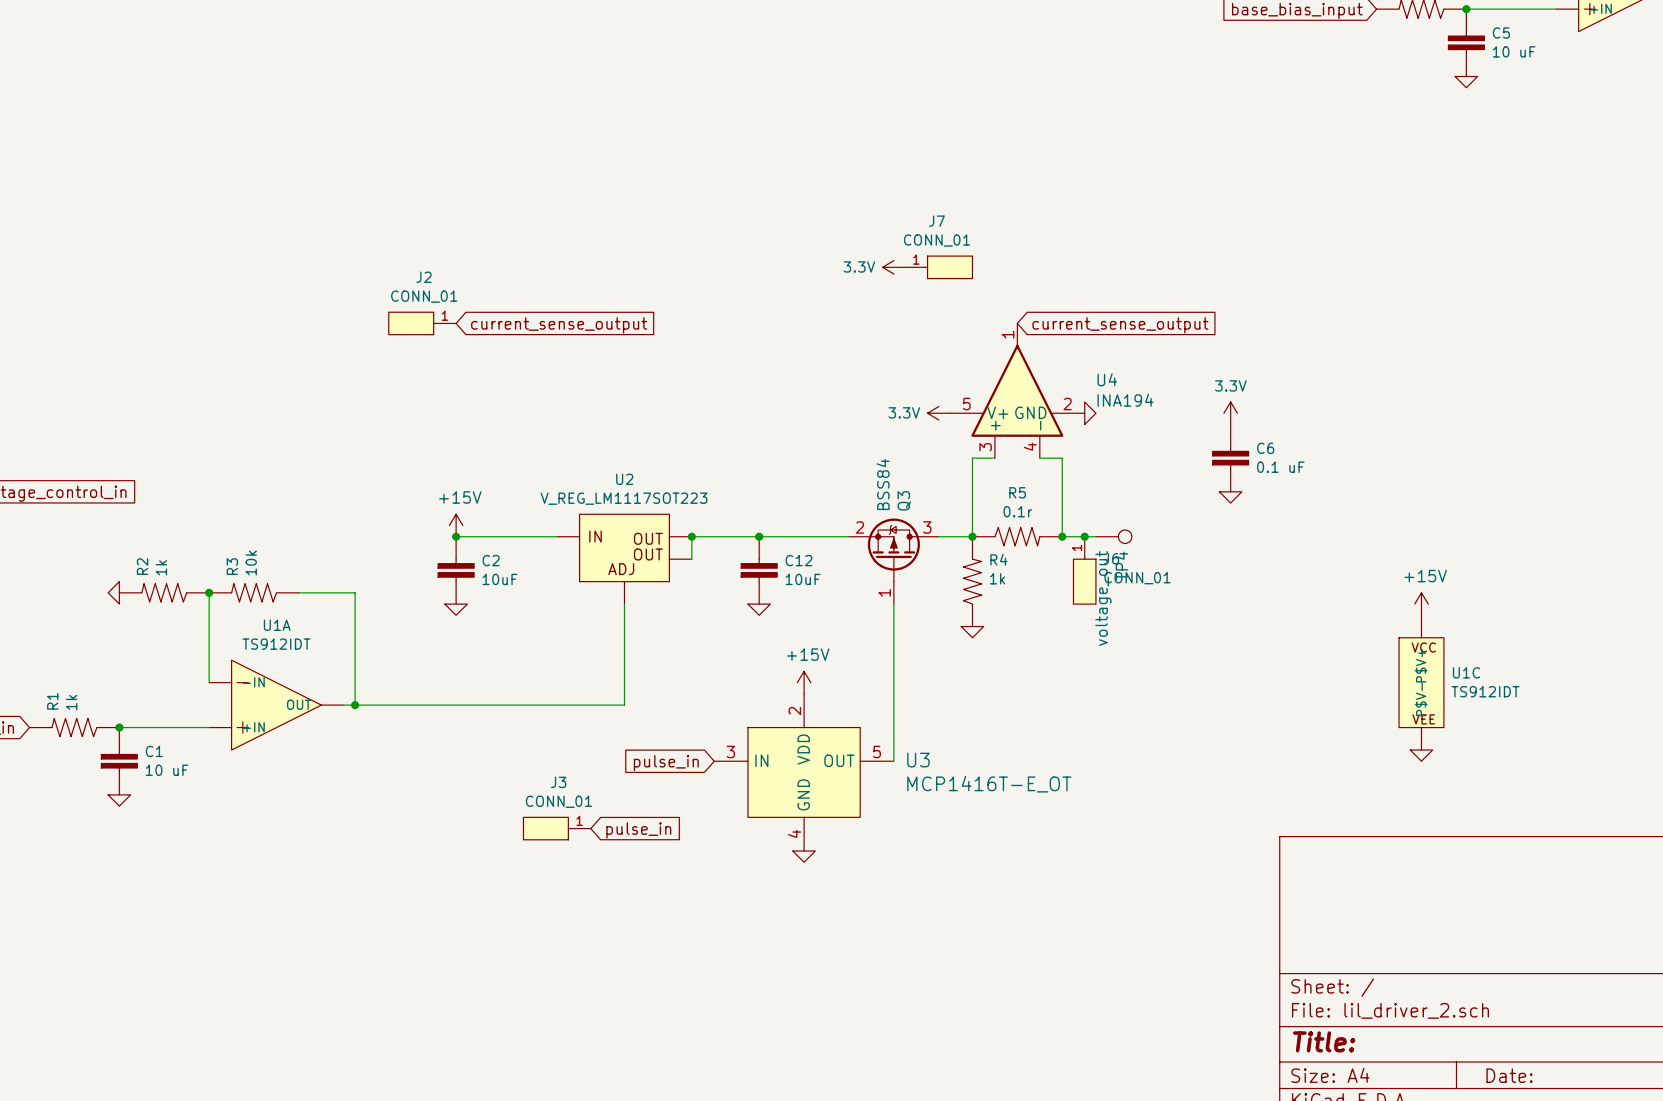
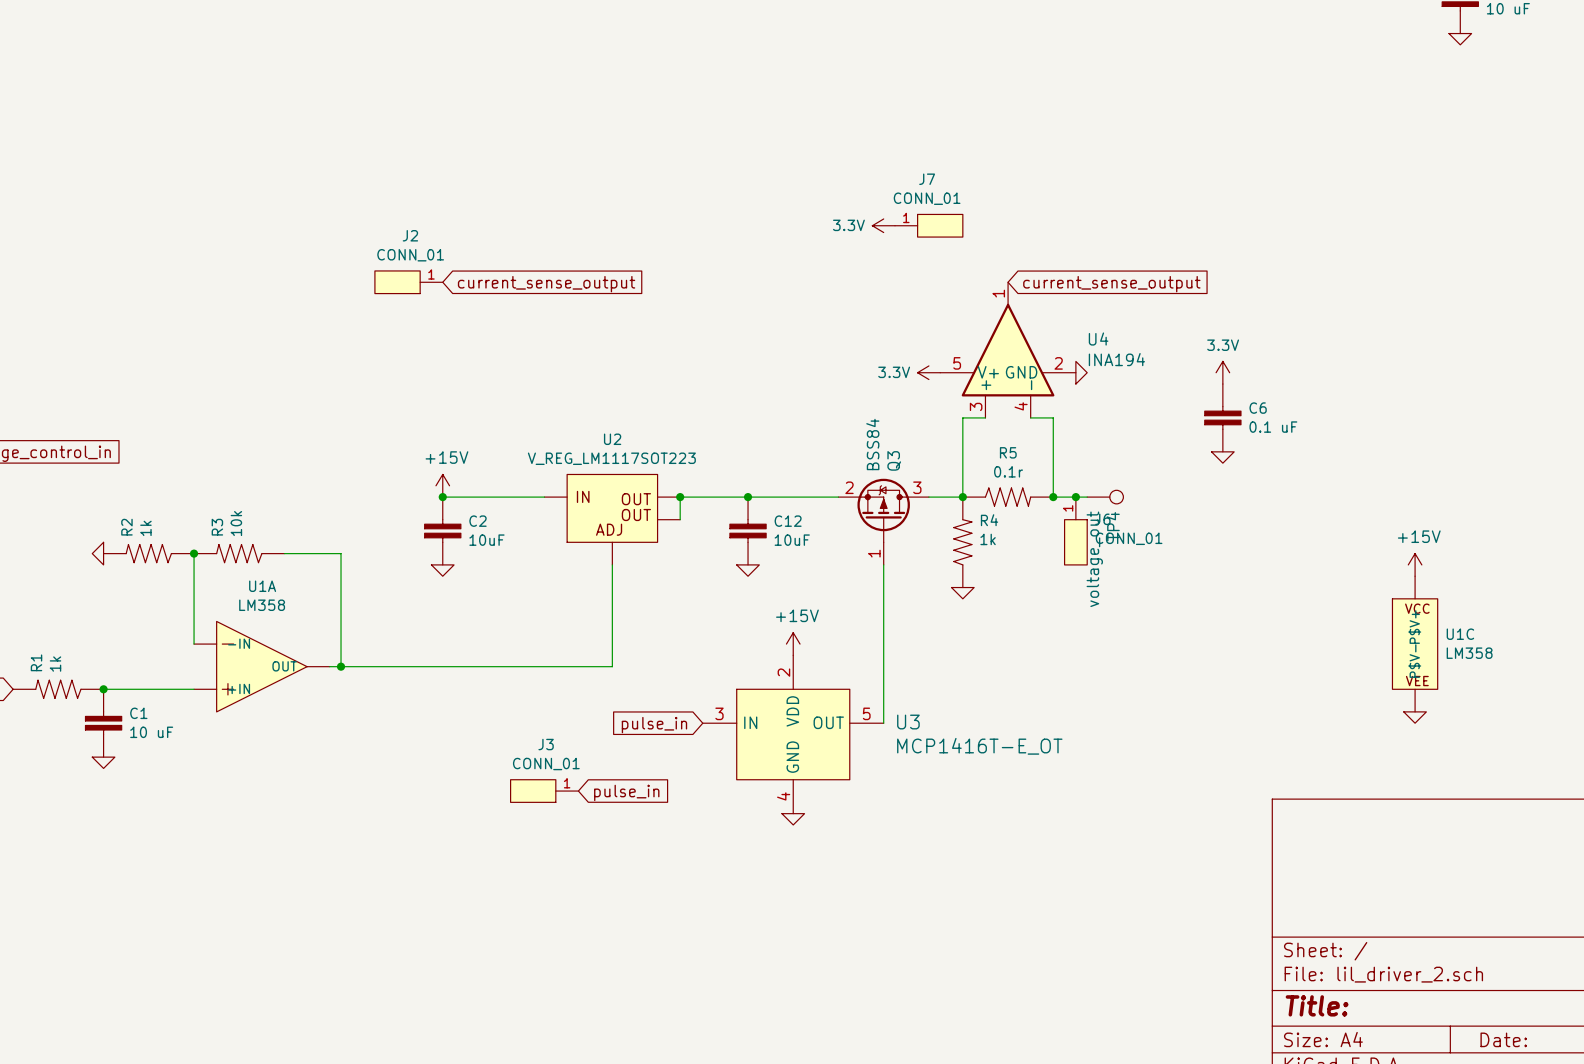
U1A value: TS912IDT (276, 644) -> LM358 (262, 605)
U1C value: TS912IDT (1485, 691) -> LM358 (1469, 653)

